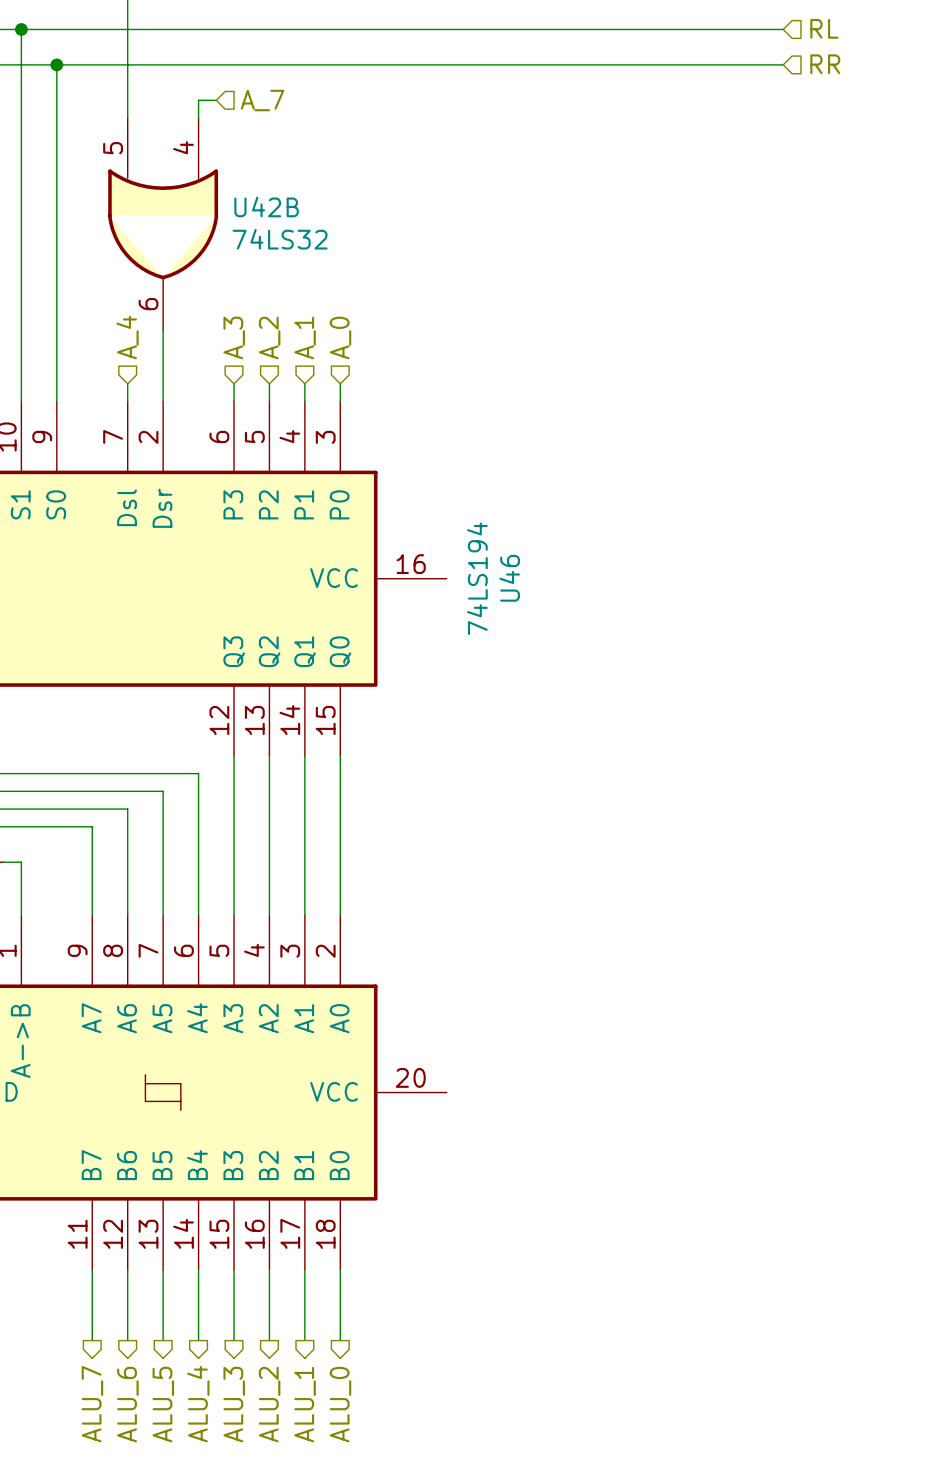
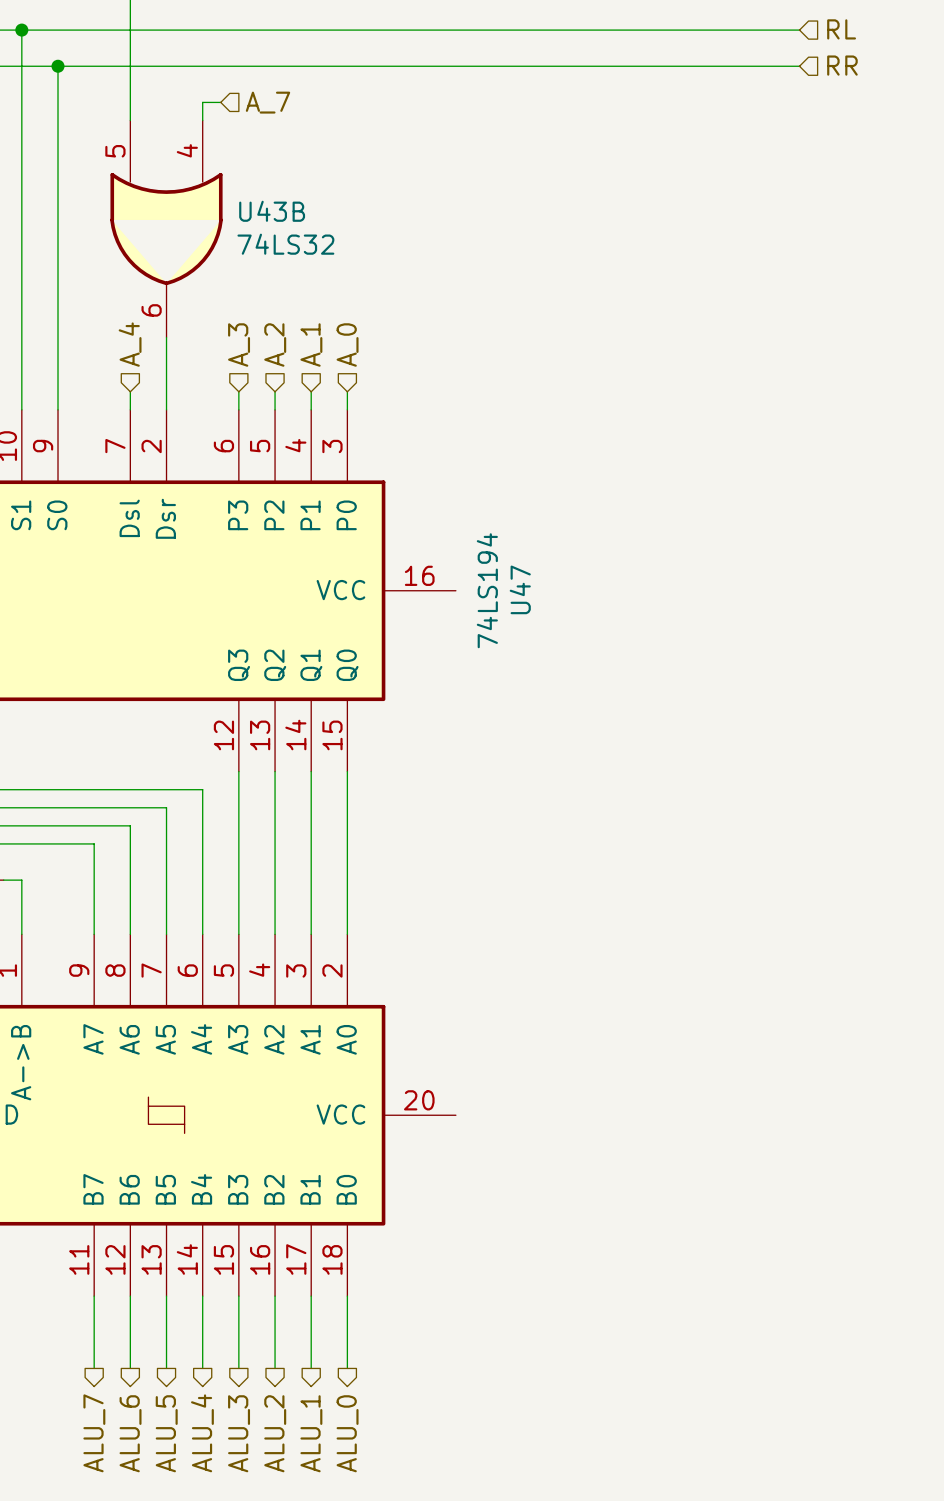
U42B name: U42B (266, 206) -> U43B (272, 211)
U46 name: U46 (509, 578) -> U47 (520, 589)

